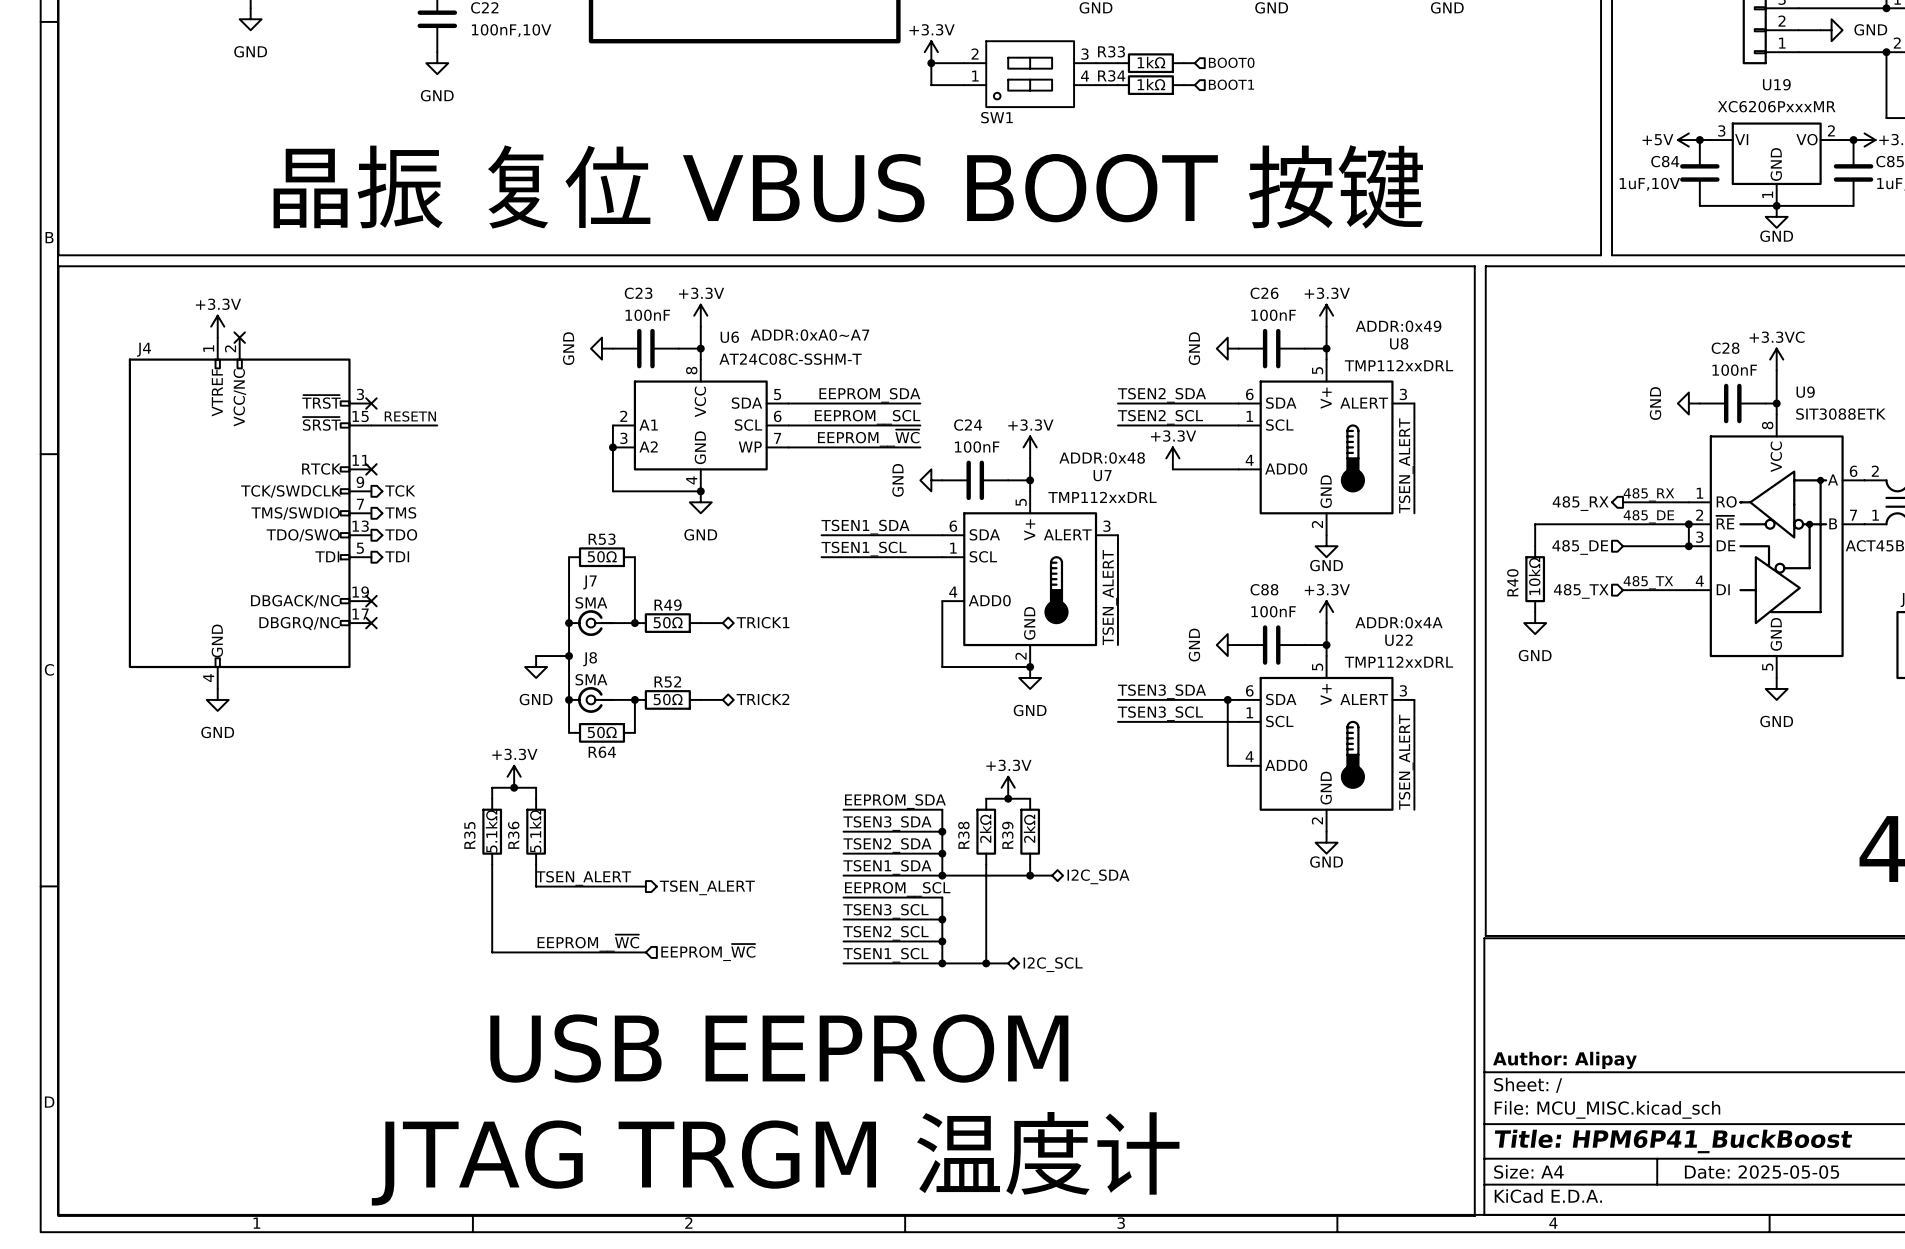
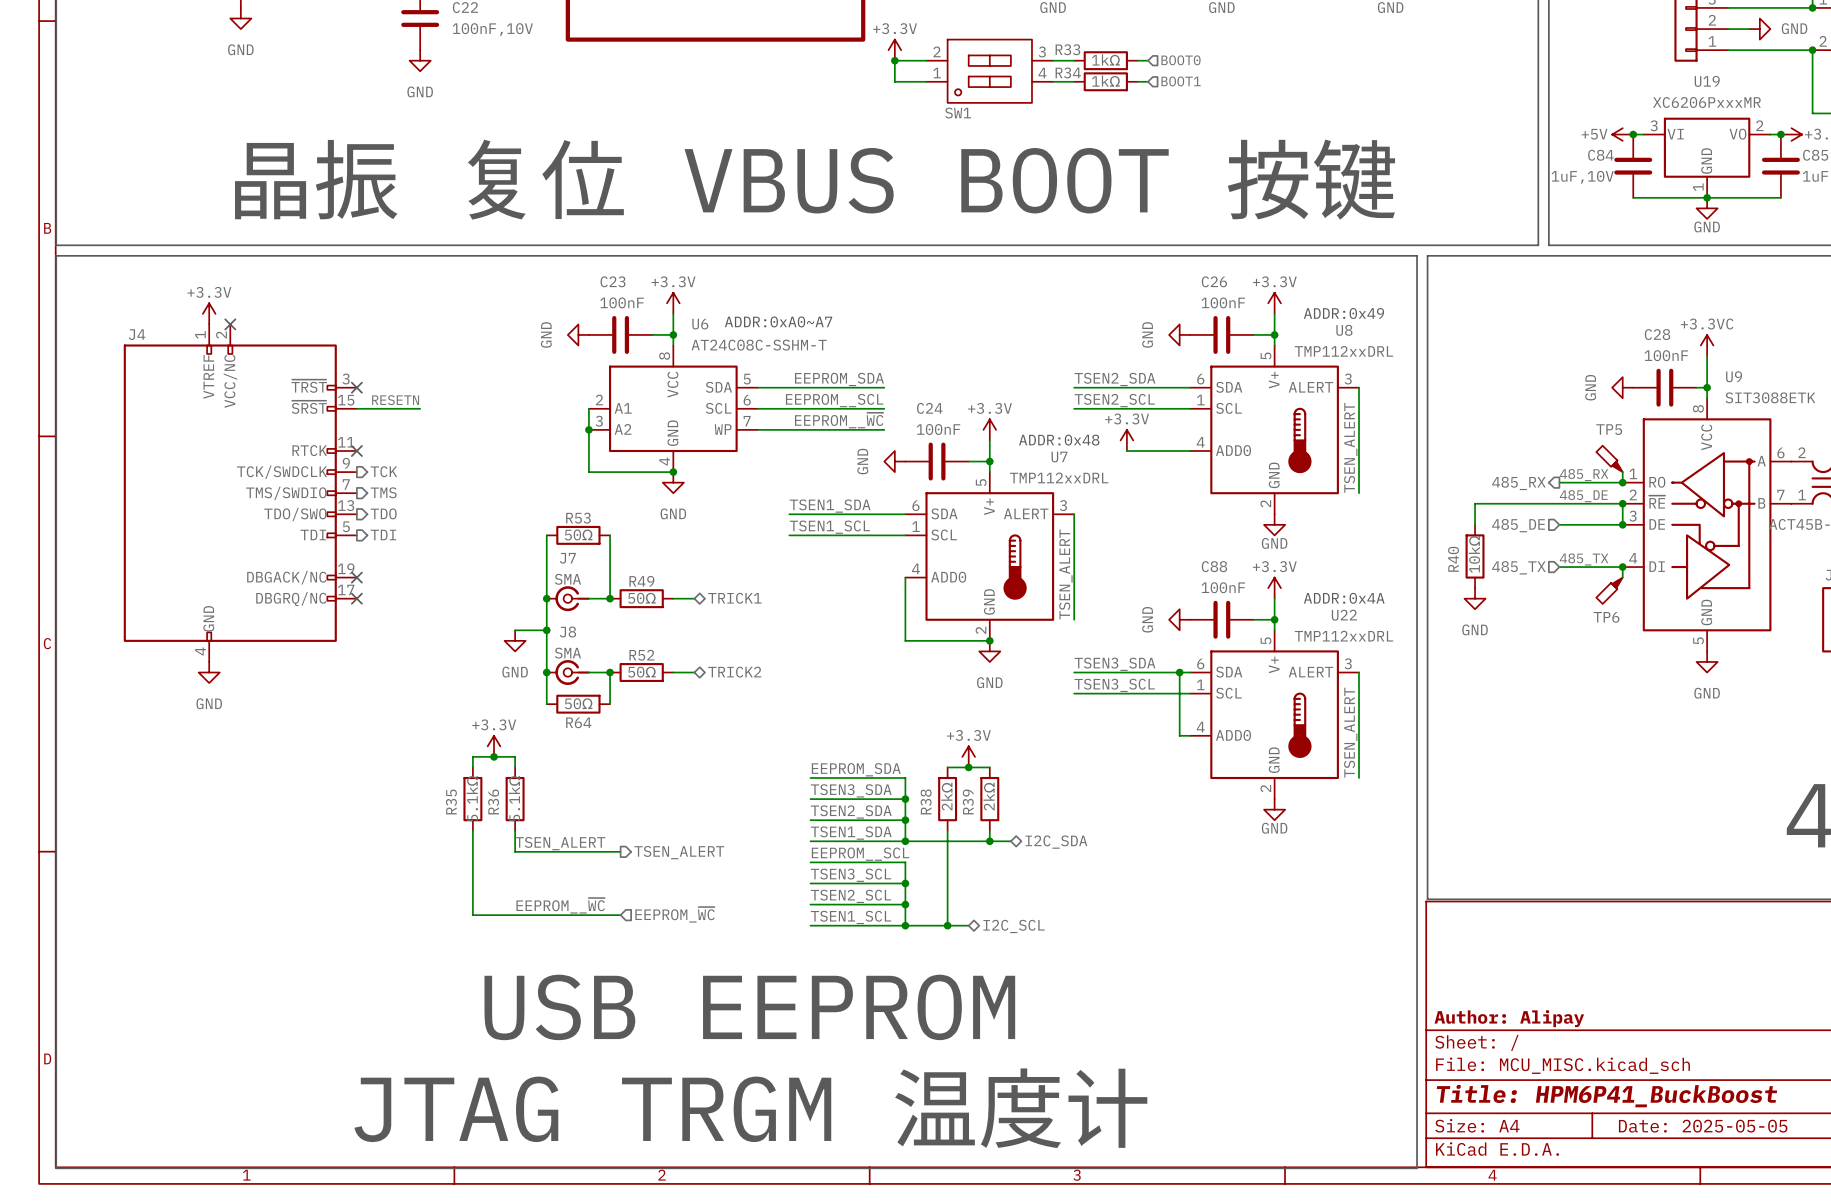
TP5: none -> (1609, 458)
wire: none -> (1622, 472) (1622, 482)
junction: none -> (1622, 482)
wire: none -> (1622, 567) (1622, 577)
junction: none -> (1622, 567)
TP6: none -> (1609, 590)

